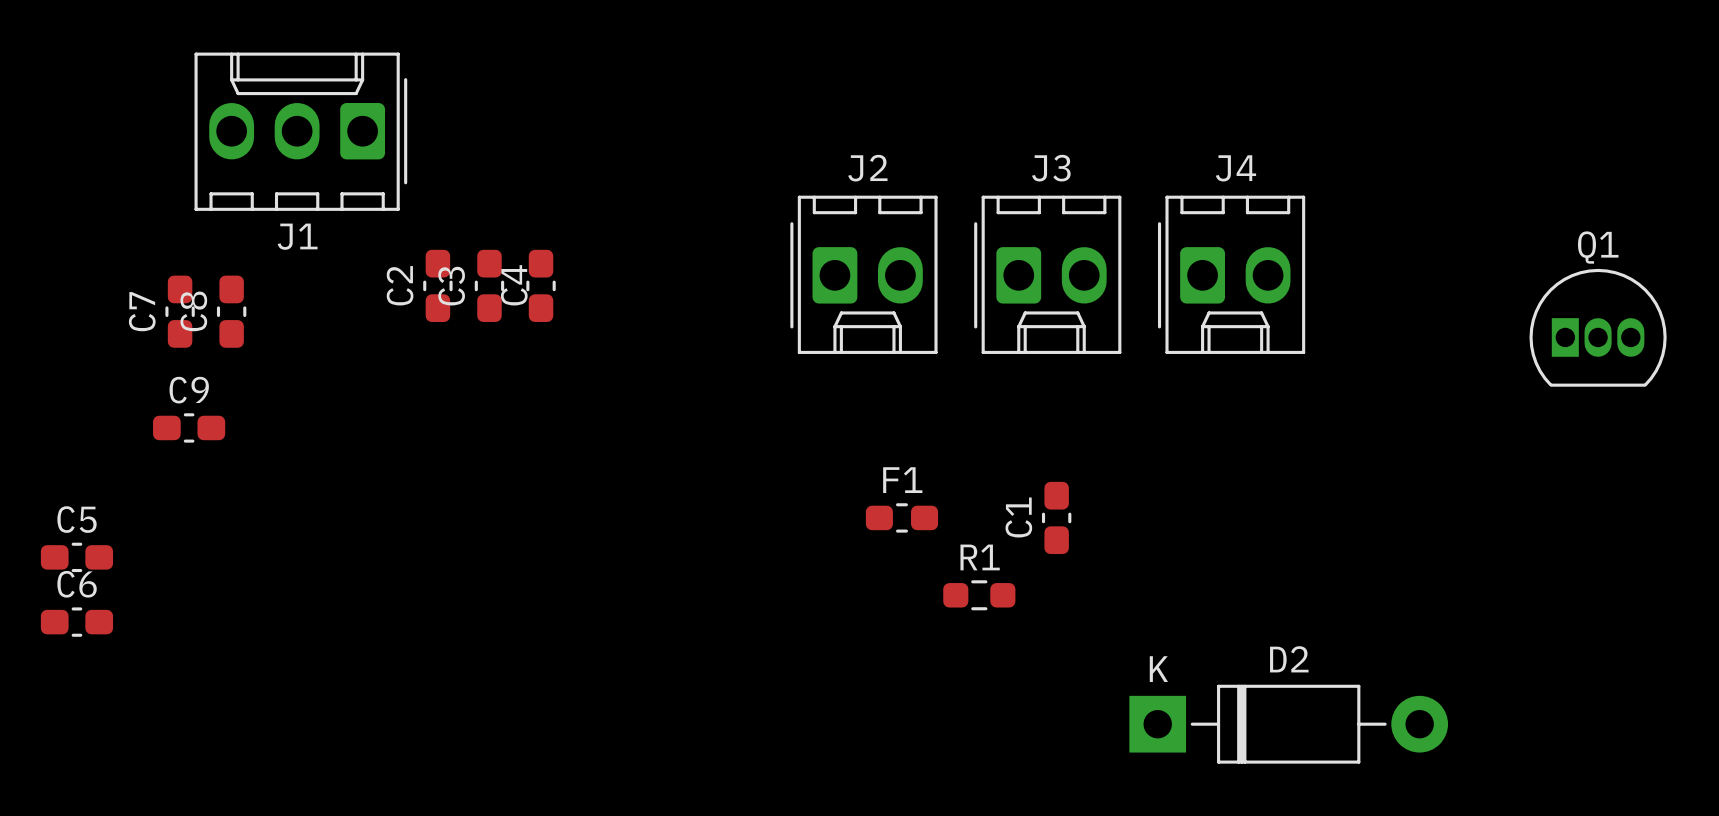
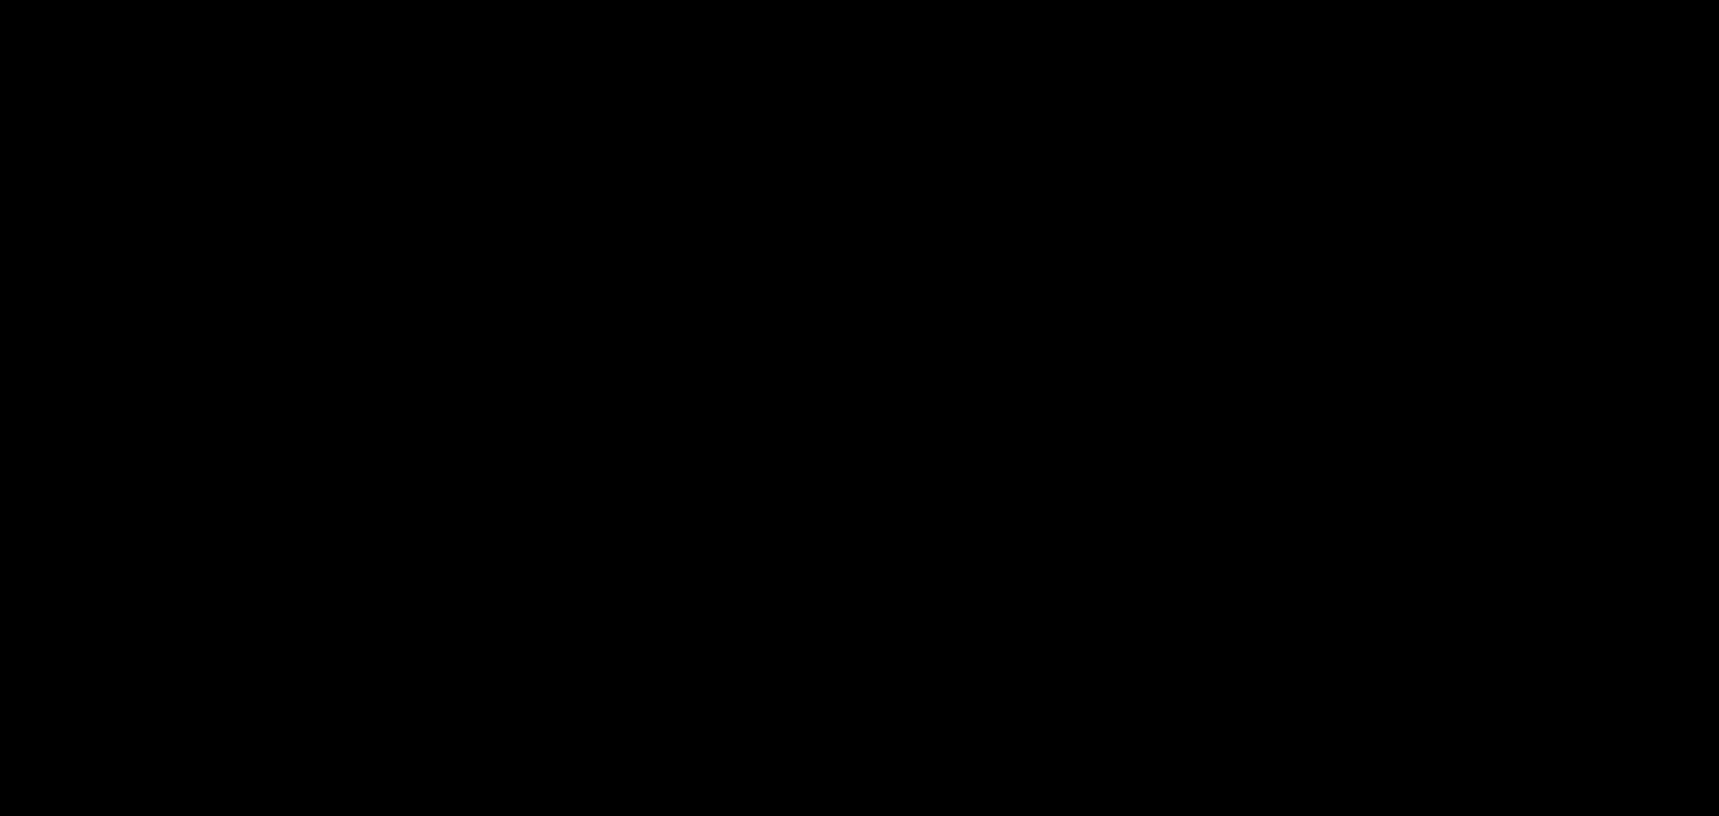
J1: (300, 131) -> none
J2: (863, 274) -> none
J3: (1047, 274) -> none
J4: (1231, 274) -> none
C2: (437, 285) -> none
C3: (489, 285) -> none
C4: (541, 285) -> none
C7: (180, 311) -> none
C8: (231, 311) -> none
Q1: (1598, 327) -> none
C9: (189, 427) -> none
F1: (901, 517) -> none
C1: (1056, 517) -> none
C5: (76, 557) -> none
R1: (979, 595) -> none
C6: (76, 622) -> none
D2: (1288, 724) -> none

